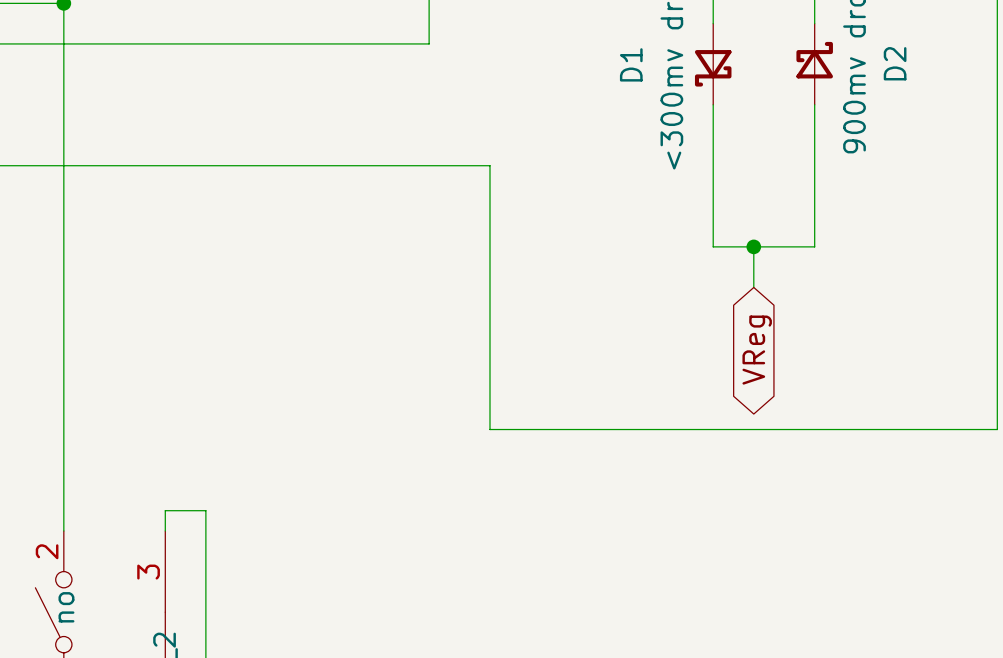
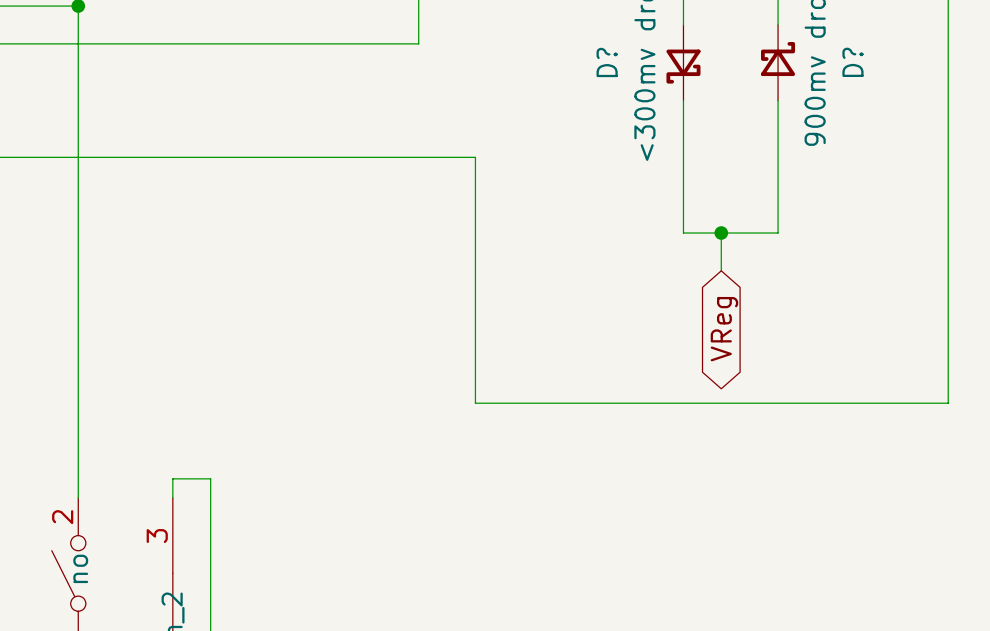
D2 name: D2 (895, 63) -> D? (852, 62)
D1 name: D1 (631, 64) -> D? (607, 62)

